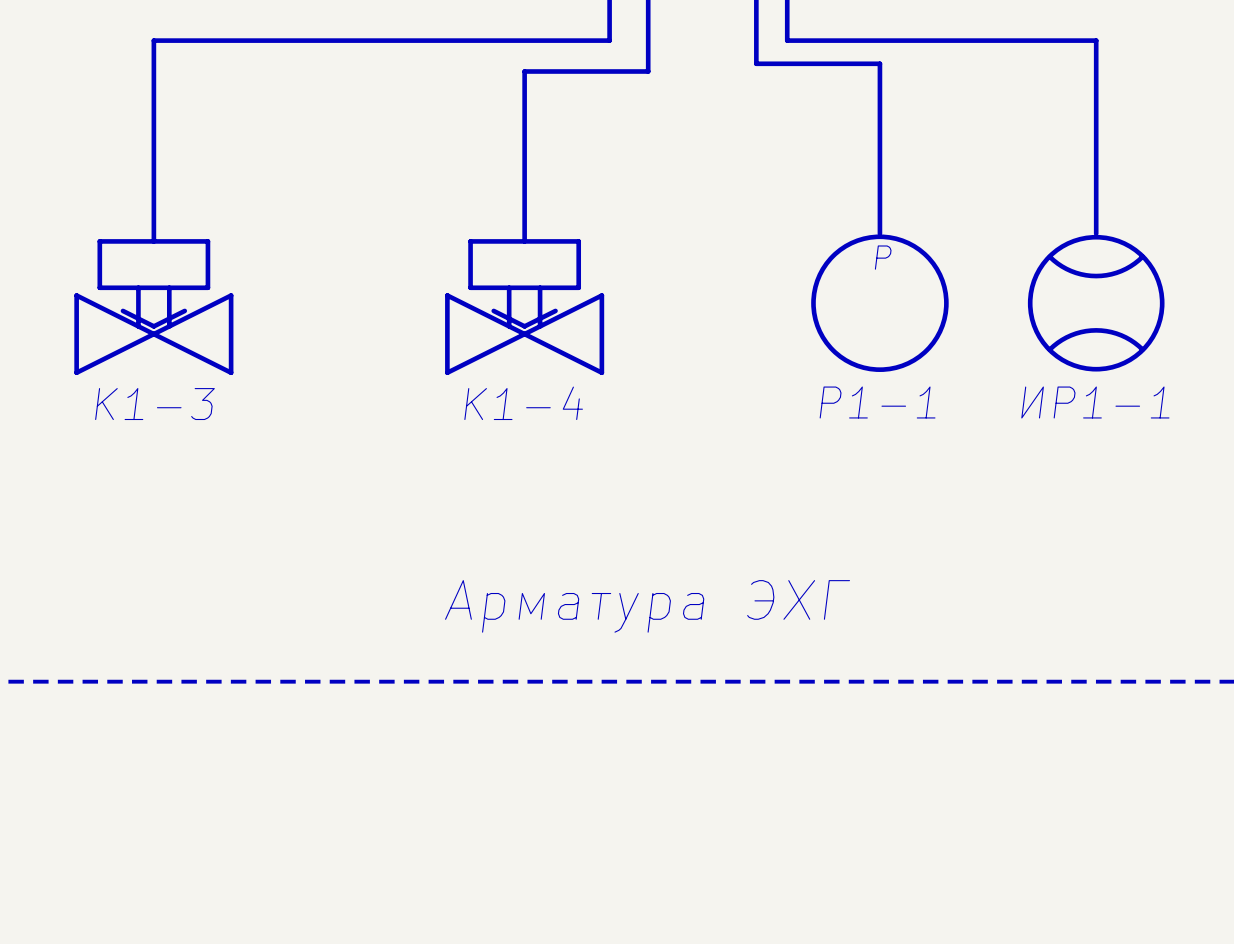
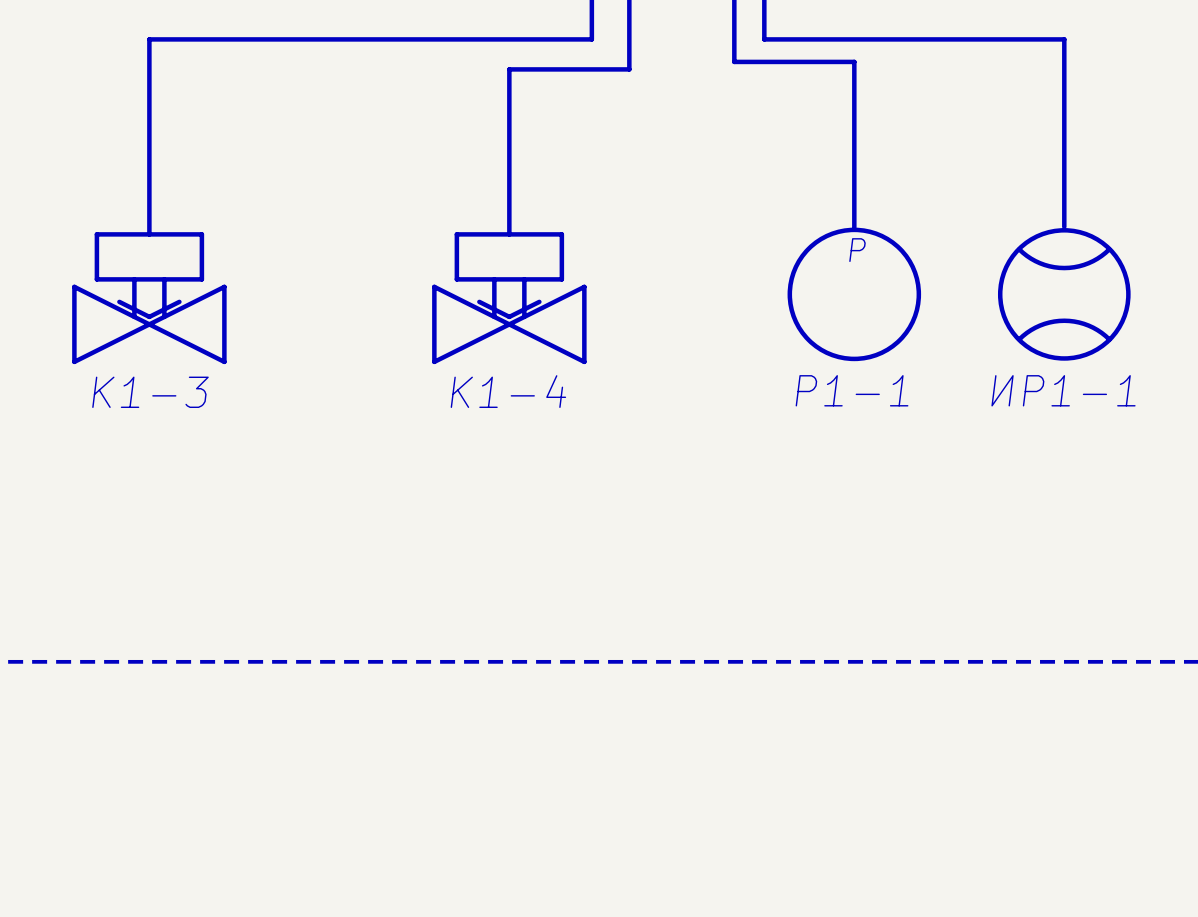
text: Арматура ЭХГ (647, 606) -> none

